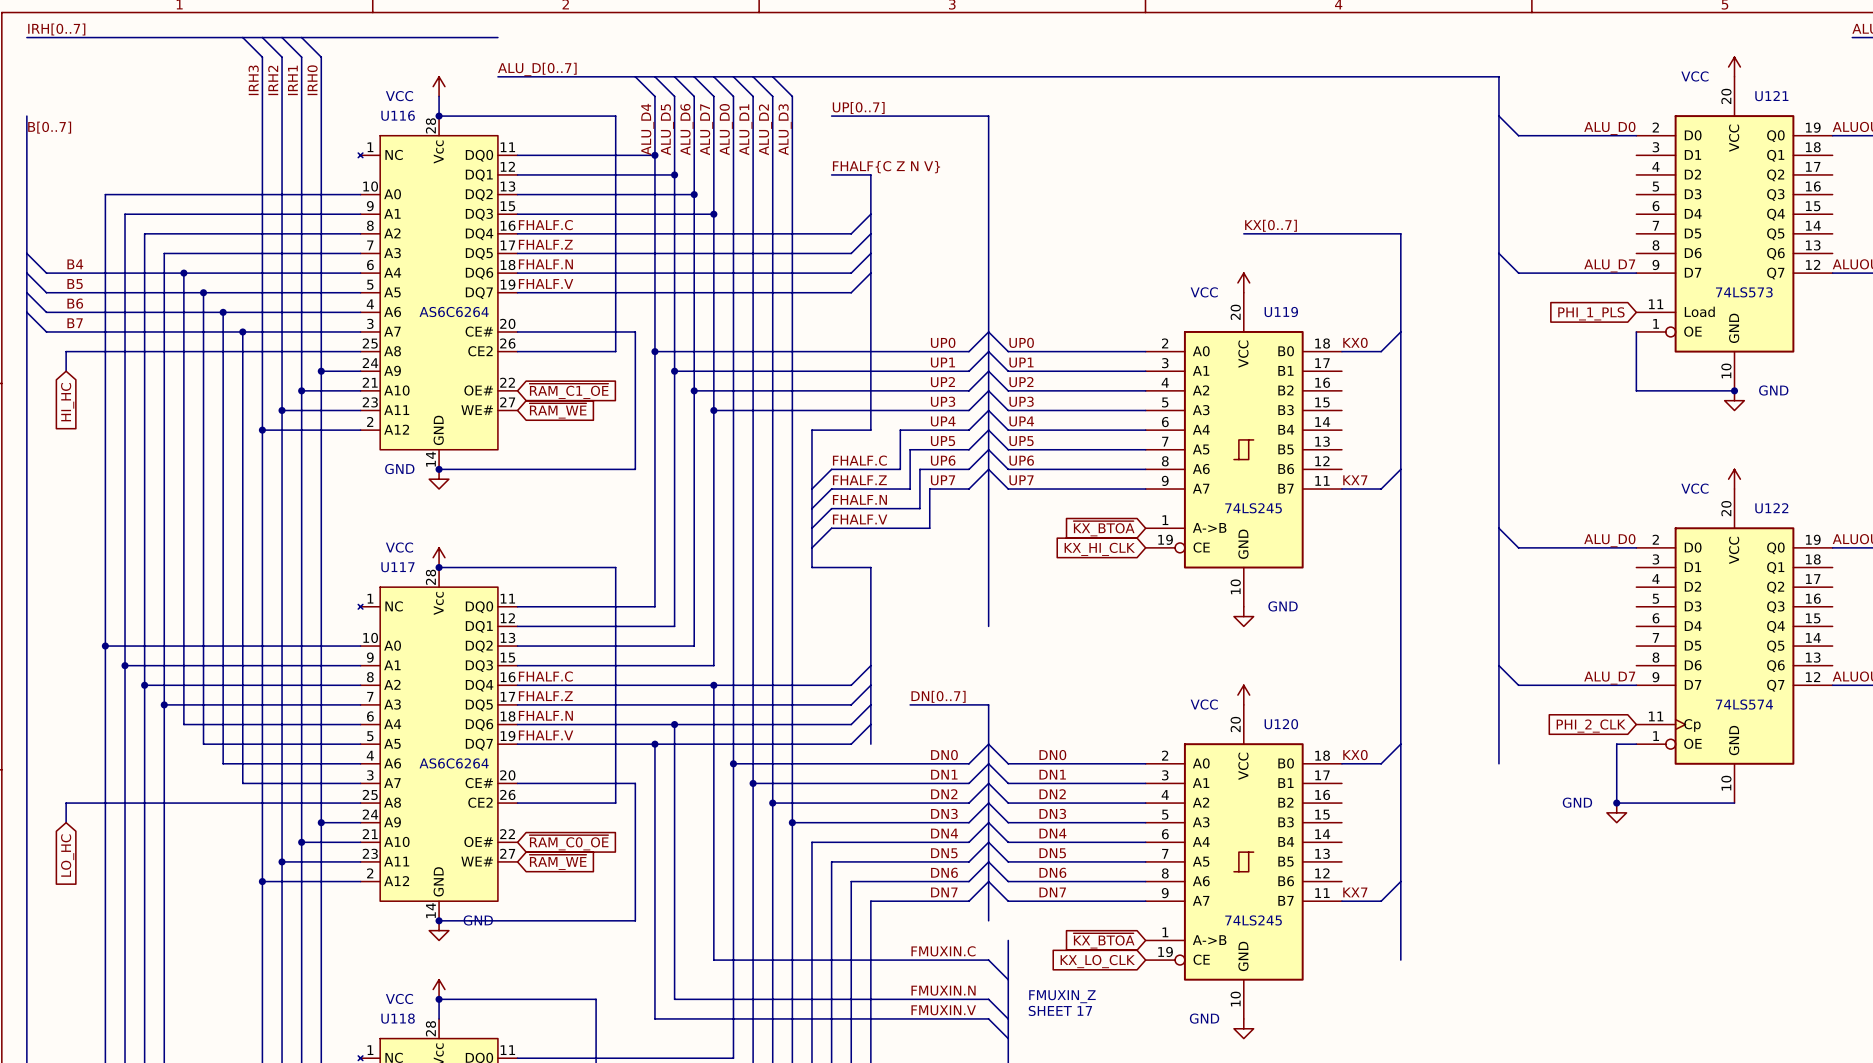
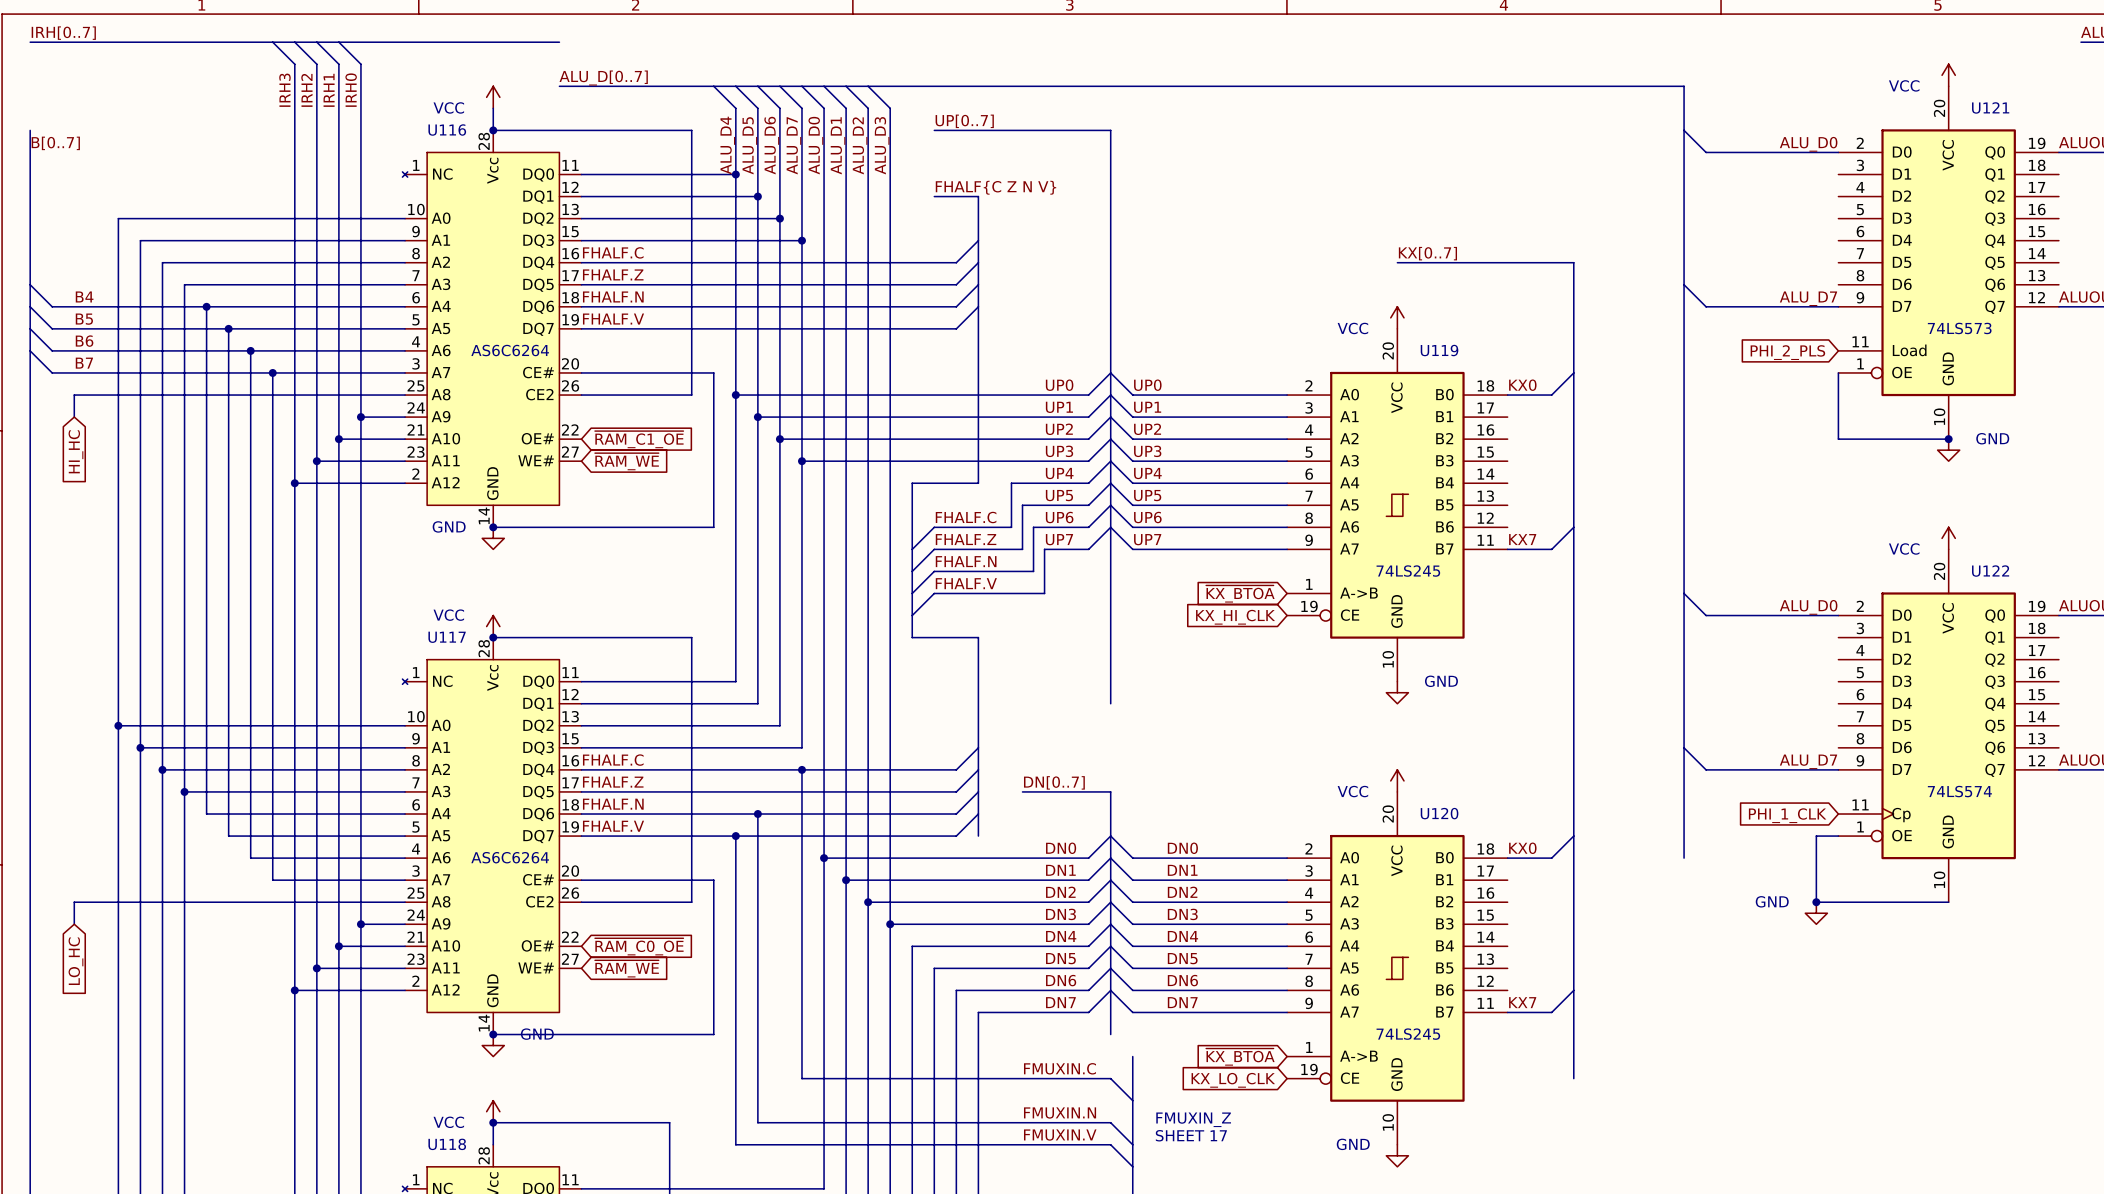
global label: PHI_1_PLS (1591, 313) -> PHI_2_PLS (1787, 352)
global label: PHI_2_CLK (1591, 726) -> PHI_1_CLK (1787, 815)

